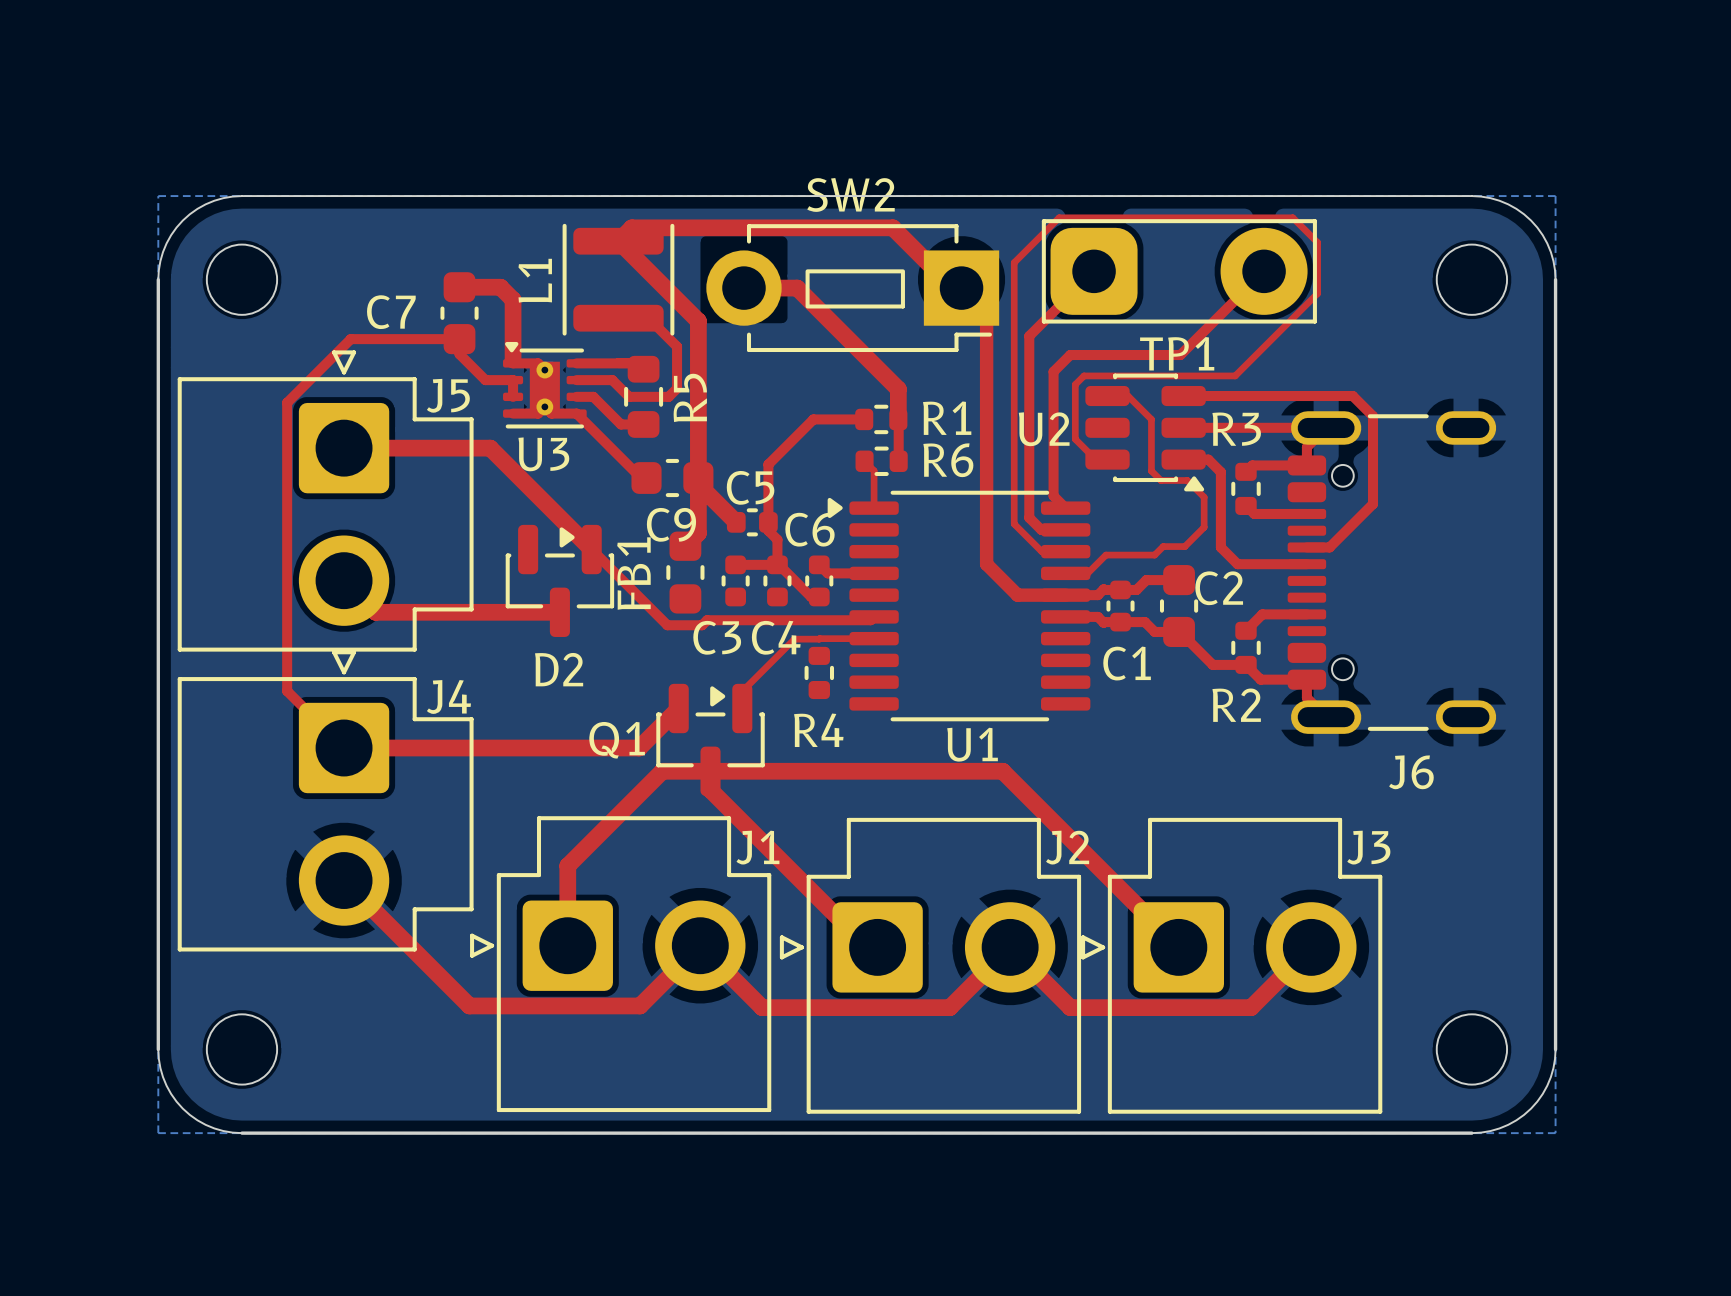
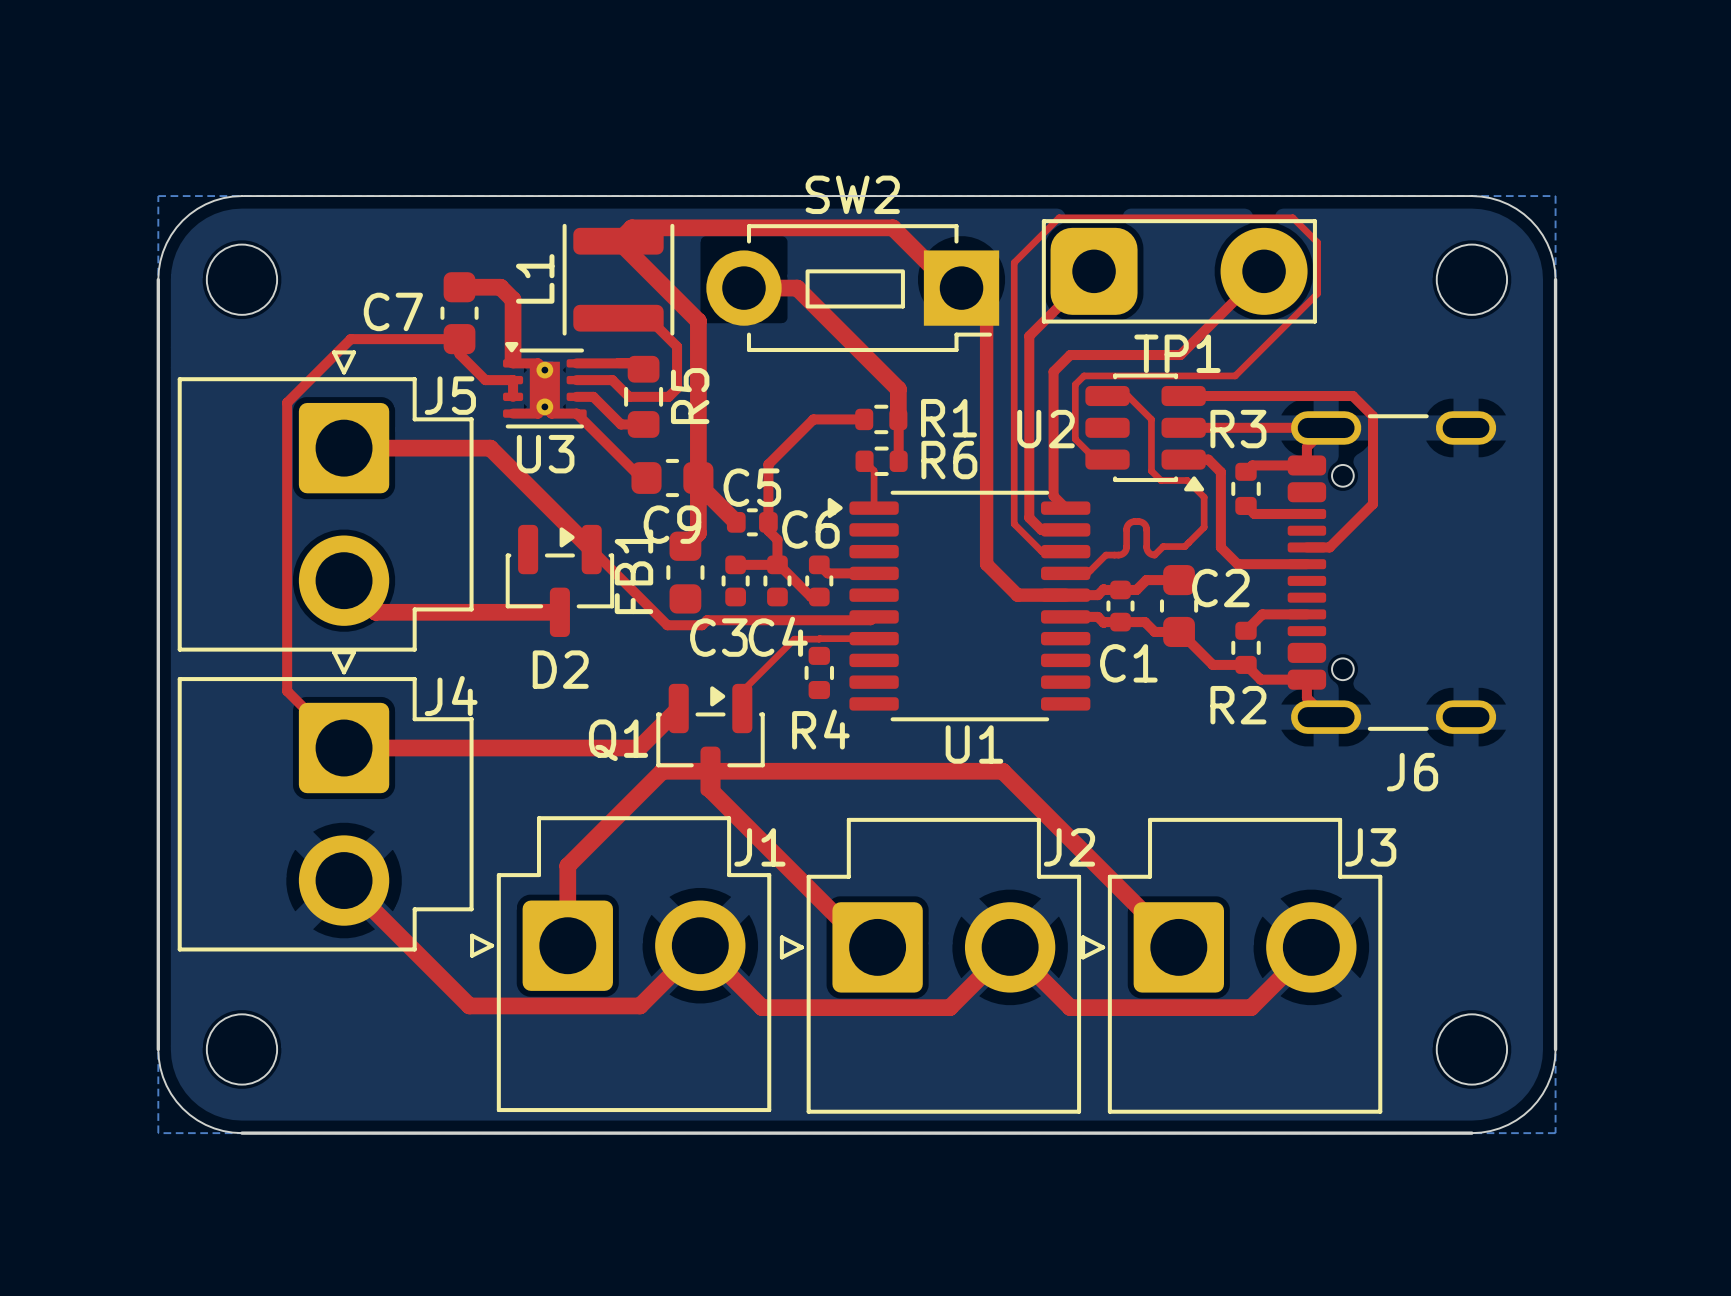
top track: (1118, 555) (1154, 555) -> (1118, 555) (1125, 550) (1127, 526) (1134, 521) (1141, 522) (1145, 525) (1147, 549) (1154, 555)

